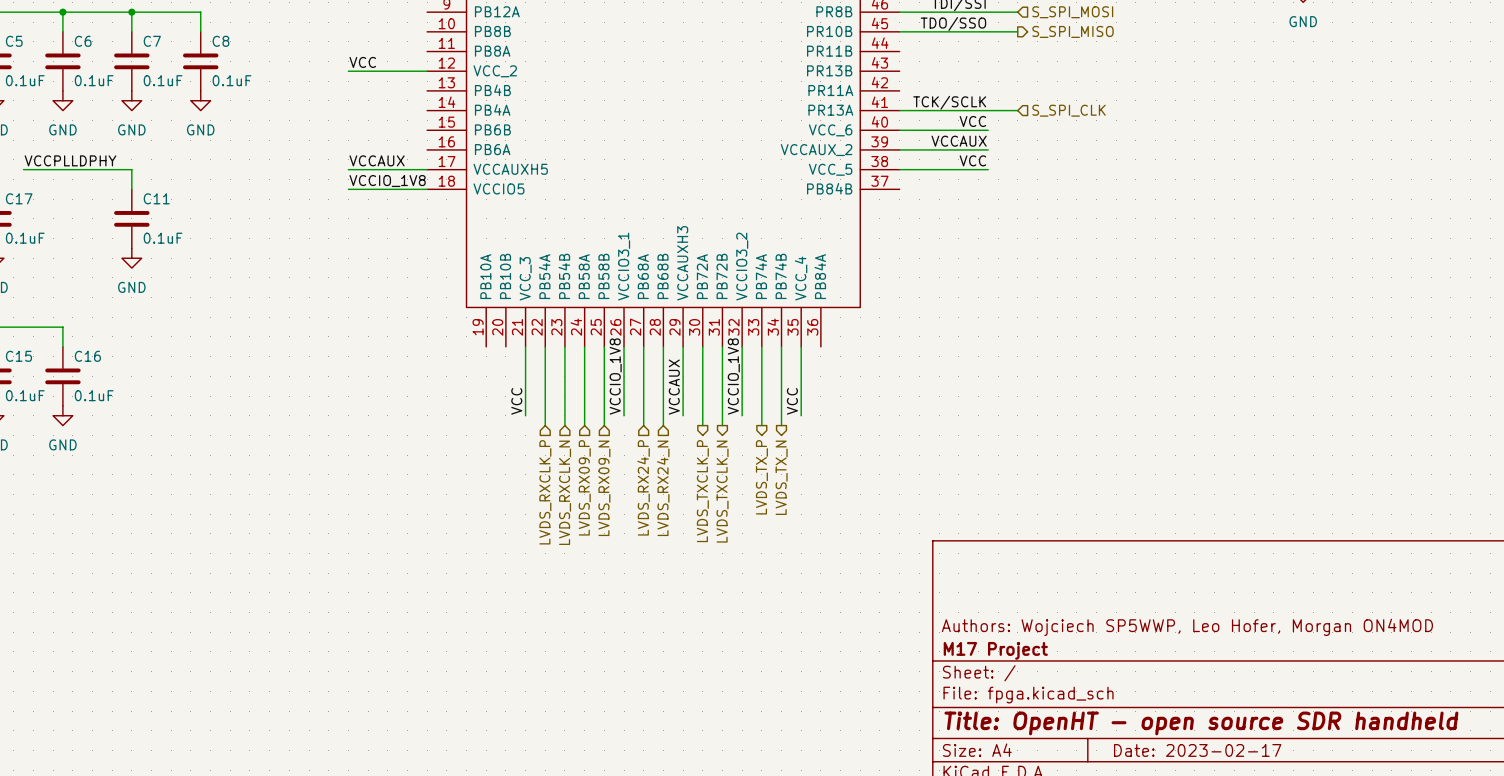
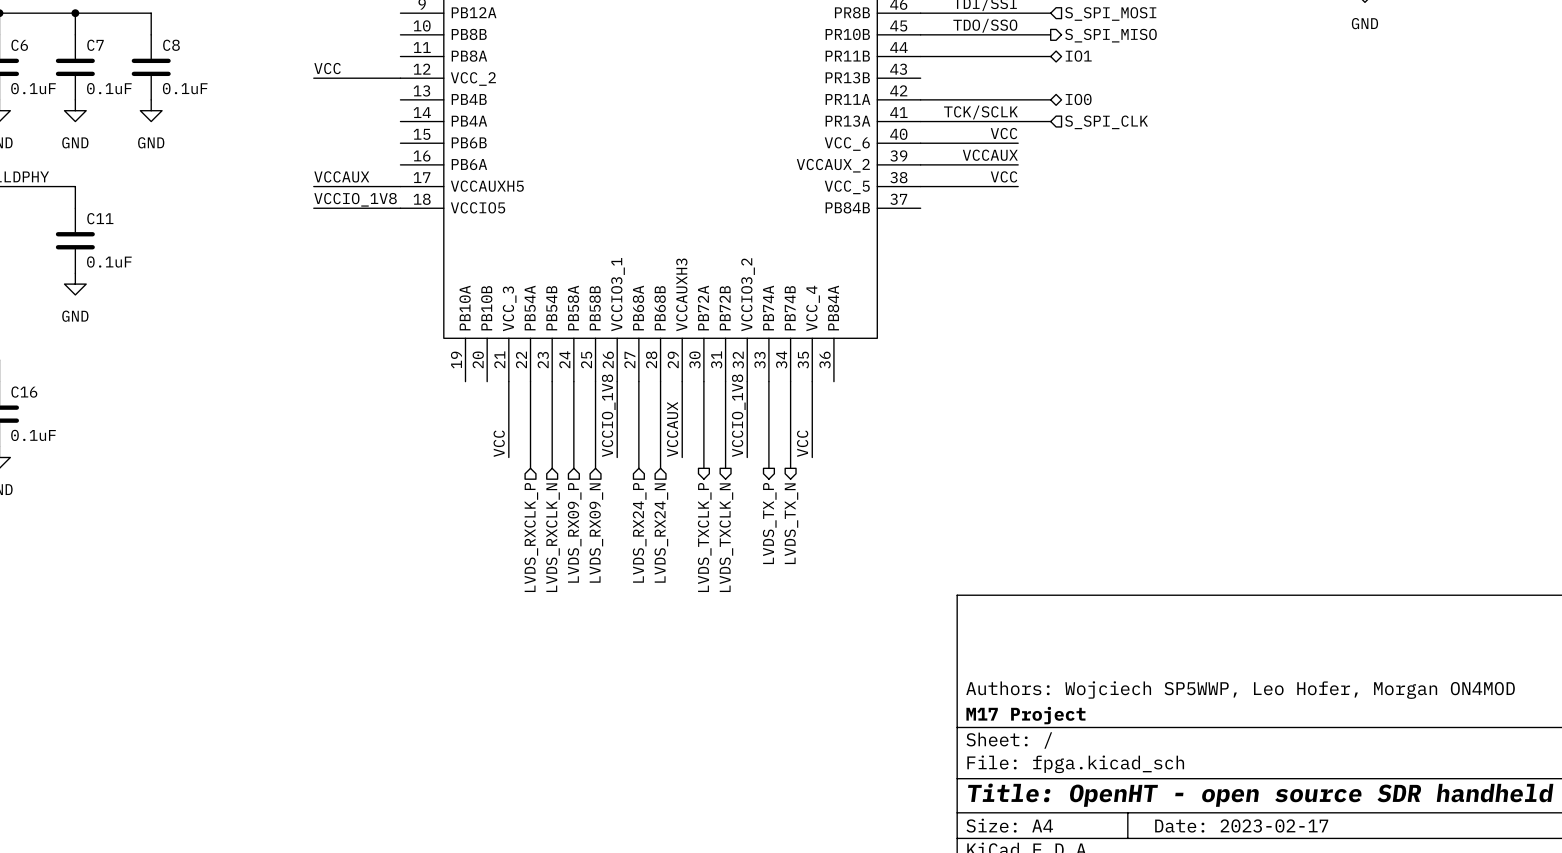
wire: none -> (920, 56) (1050, 56)
hierarchical label: none -> IO1 (1078, 56)
wire: none -> (920, 99) (1050, 99)
hierarchical label: none -> IO0 (1078, 99)

